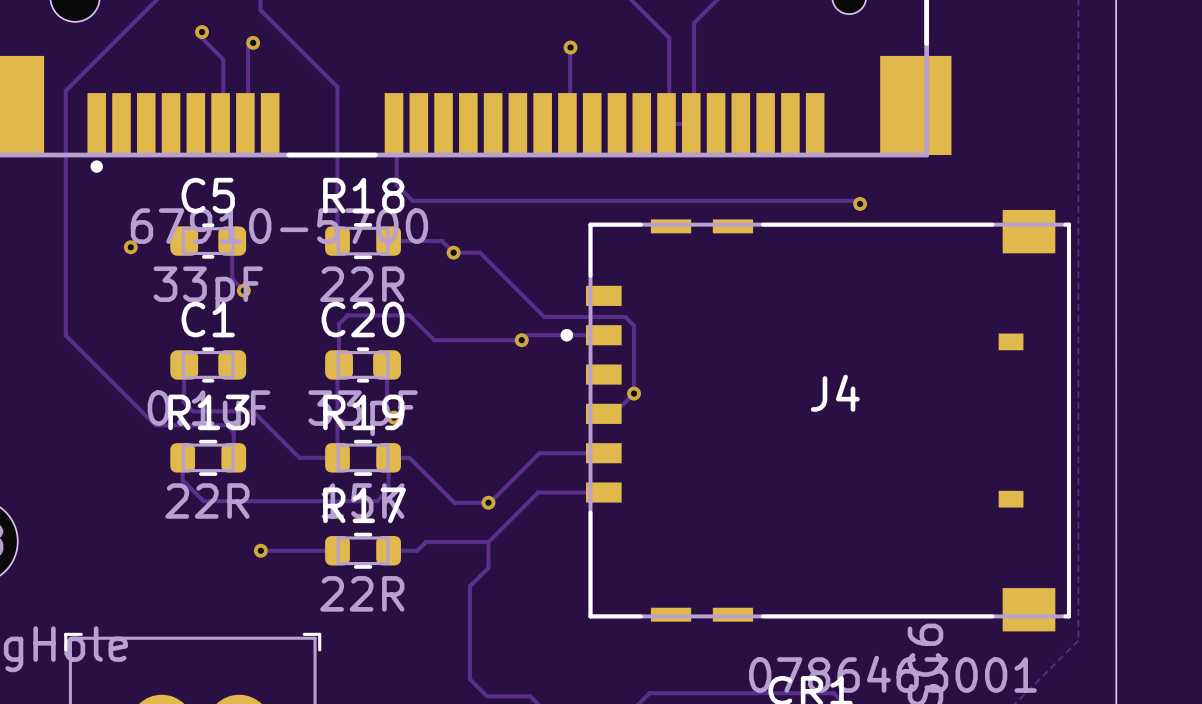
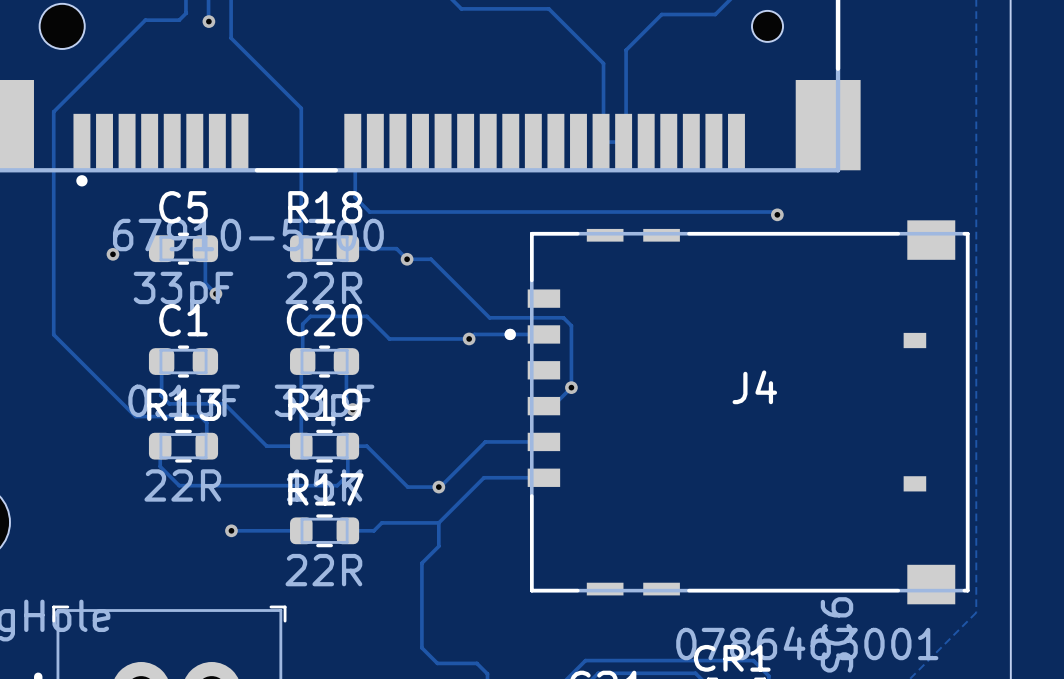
track: (202, 32) (202, 38) (223, 59) (223, 124) -> none
via: (202, 32) -> none
track: (253, 42) (248, 47) (248, 124) -> none
via: (253, 42) -> none
track: (570, 47) (570, 124) -> none
via: (570, 47) -> none

